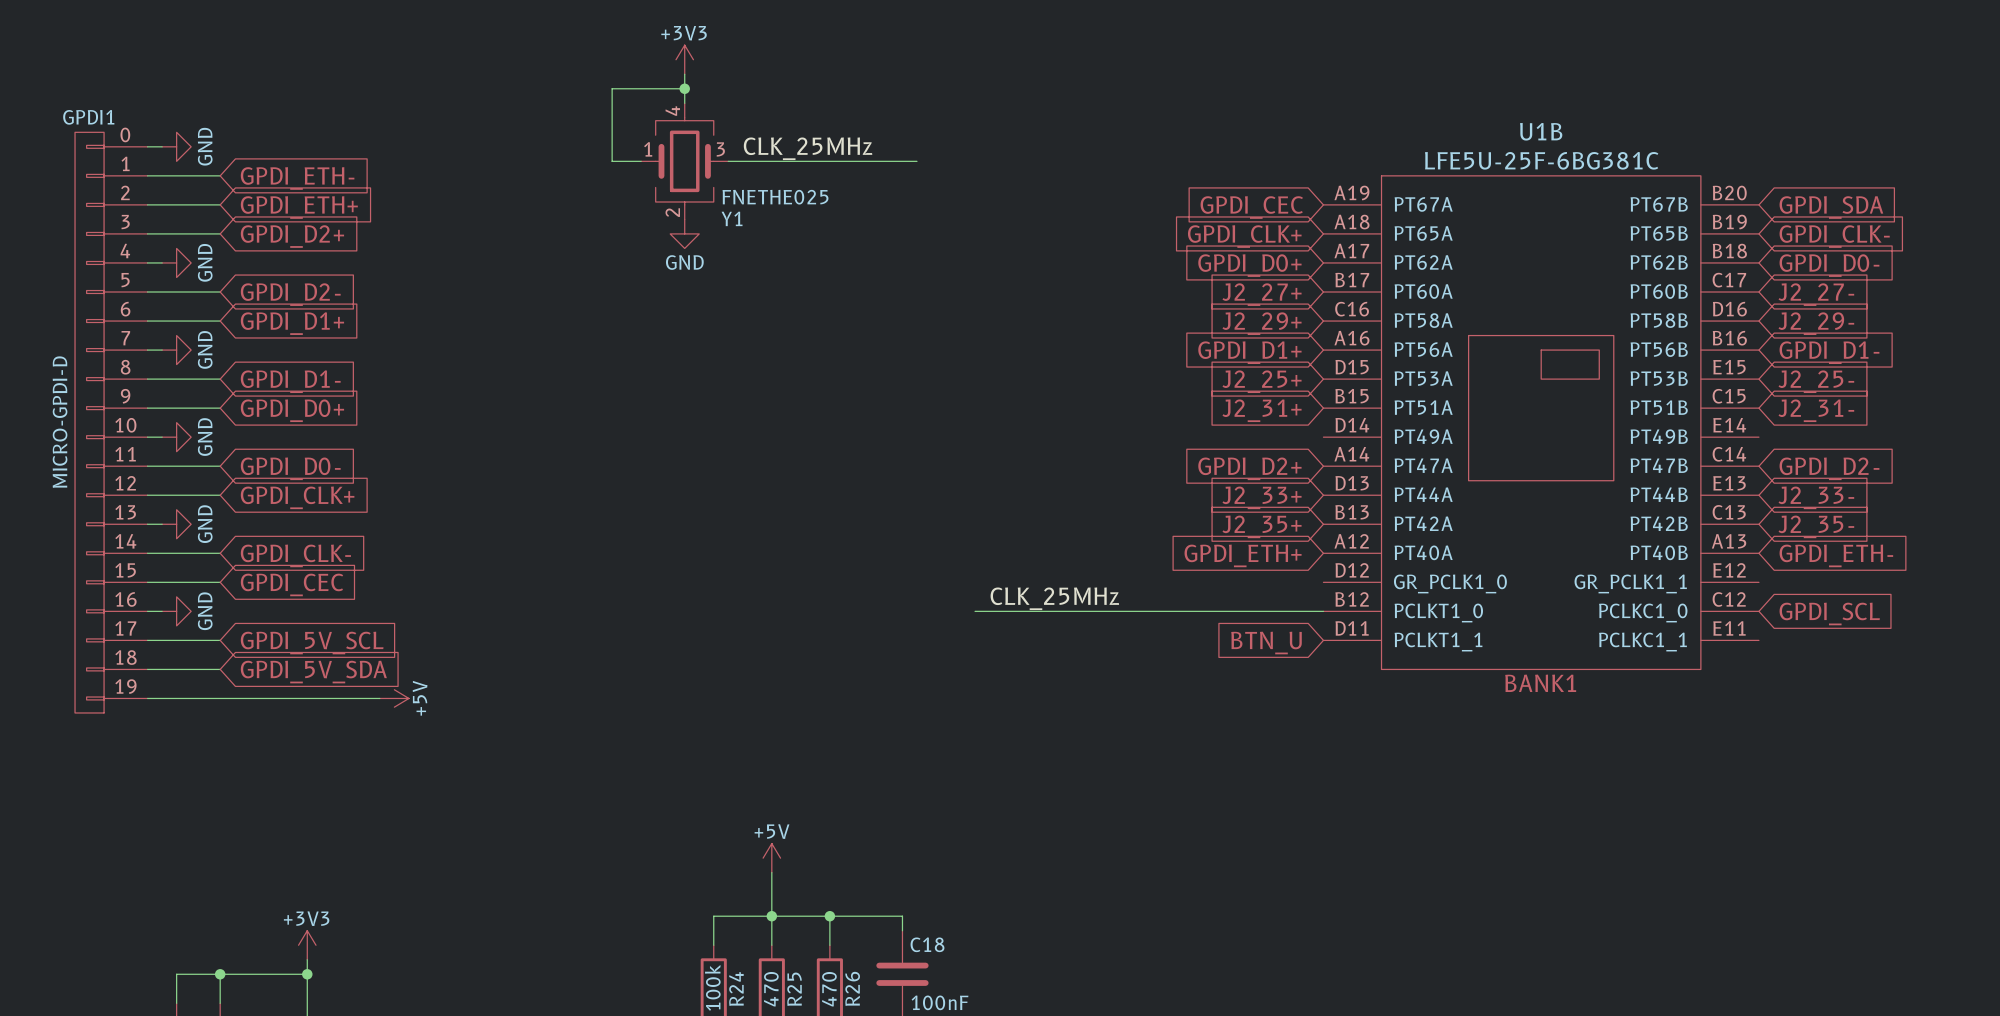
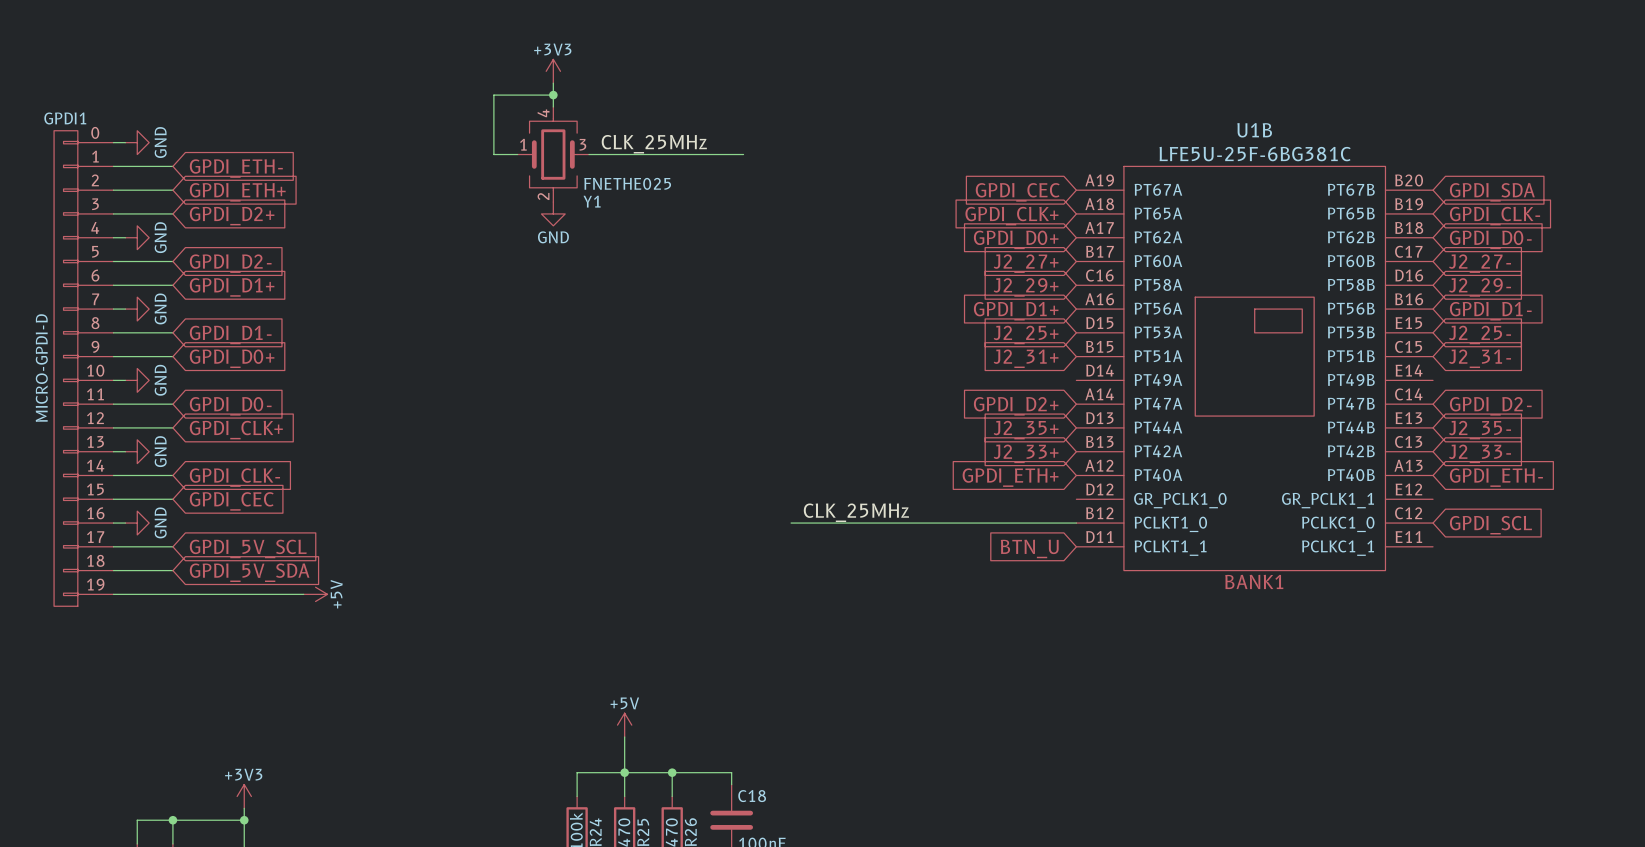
global label: J2_33+ (1262, 497) -> J2_35+ (1026, 430)
global label: J2_33- (1816, 497) -> J2_35- (1480, 430)
global label: J2_35+ (1262, 526) -> J2_33+ (1026, 453)
global label: J2_35- (1816, 526) -> J2_33- (1480, 453)

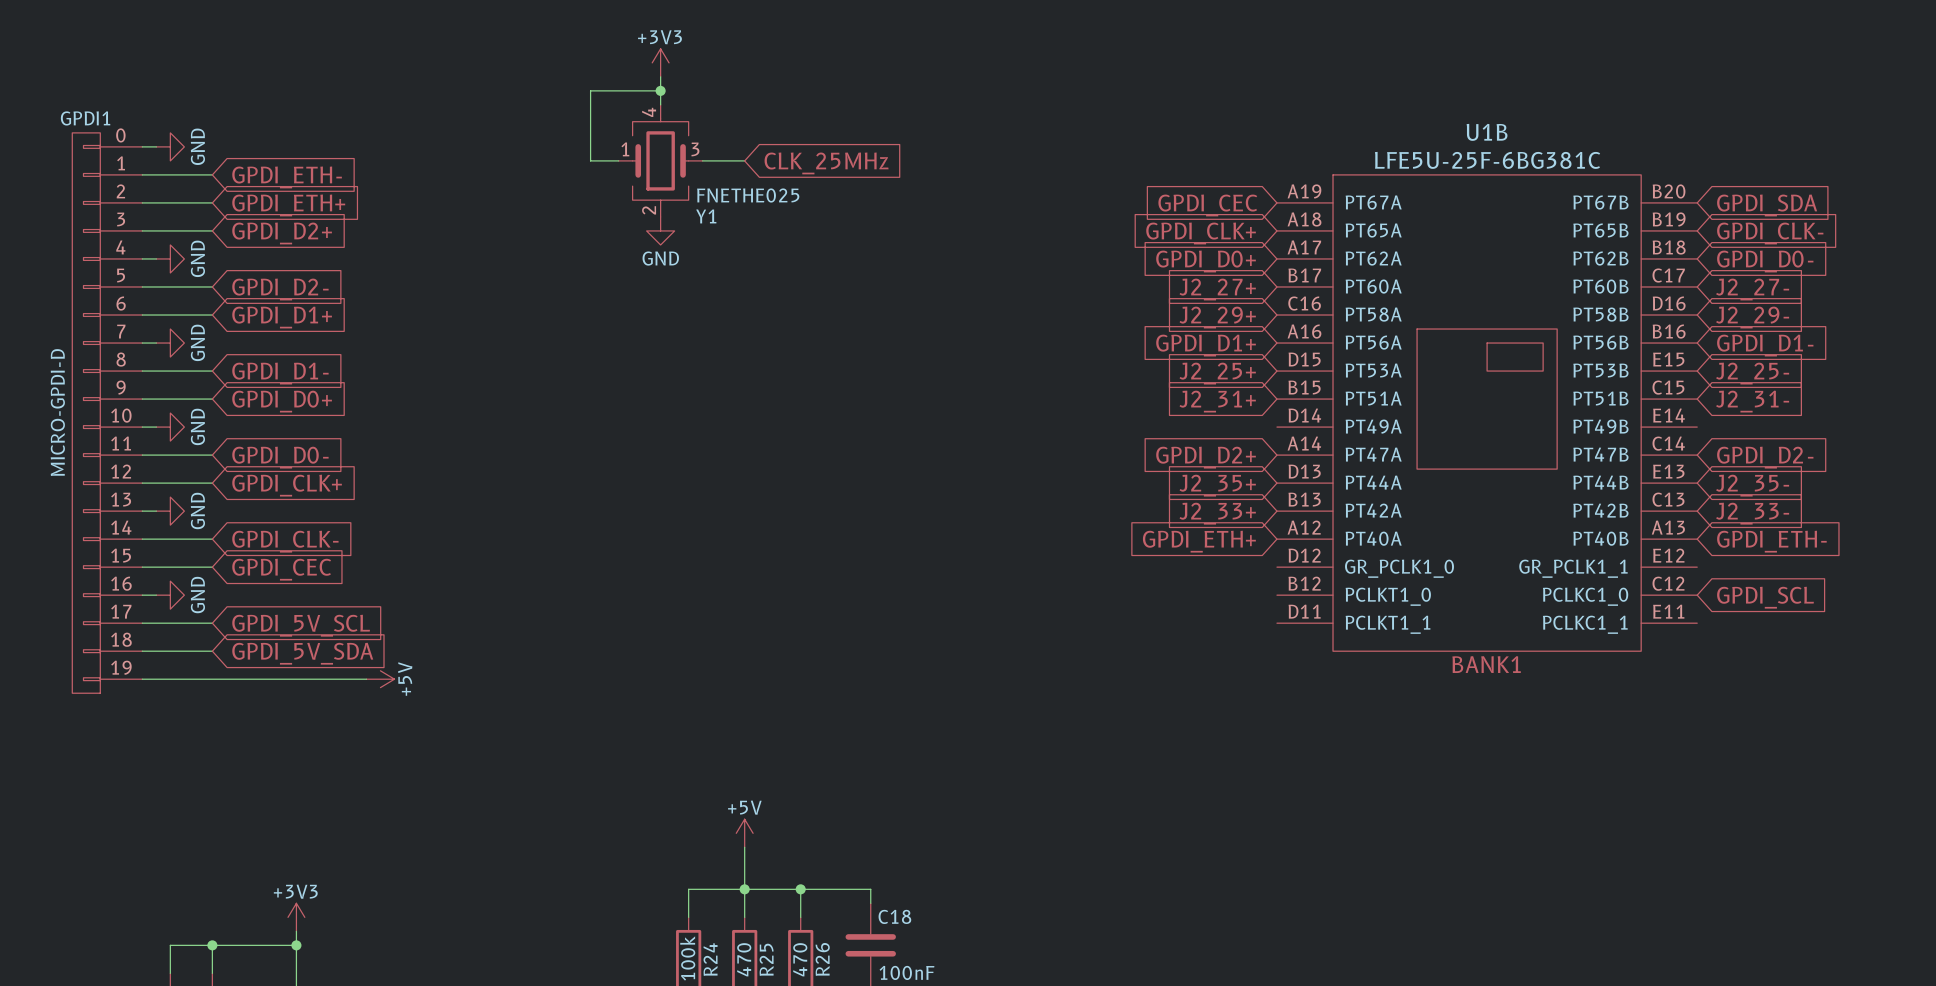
label: CLK_25MHz (654, 144) -> none
wire: (624, 154) (743, 154) -> none
global label: none -> CLK_25MHz (826, 163)
label: CLK_25MHz (856, 512) -> none
wire: (791, 523) (1076, 523) -> none
global label: BTN_U (1029, 548) -> none

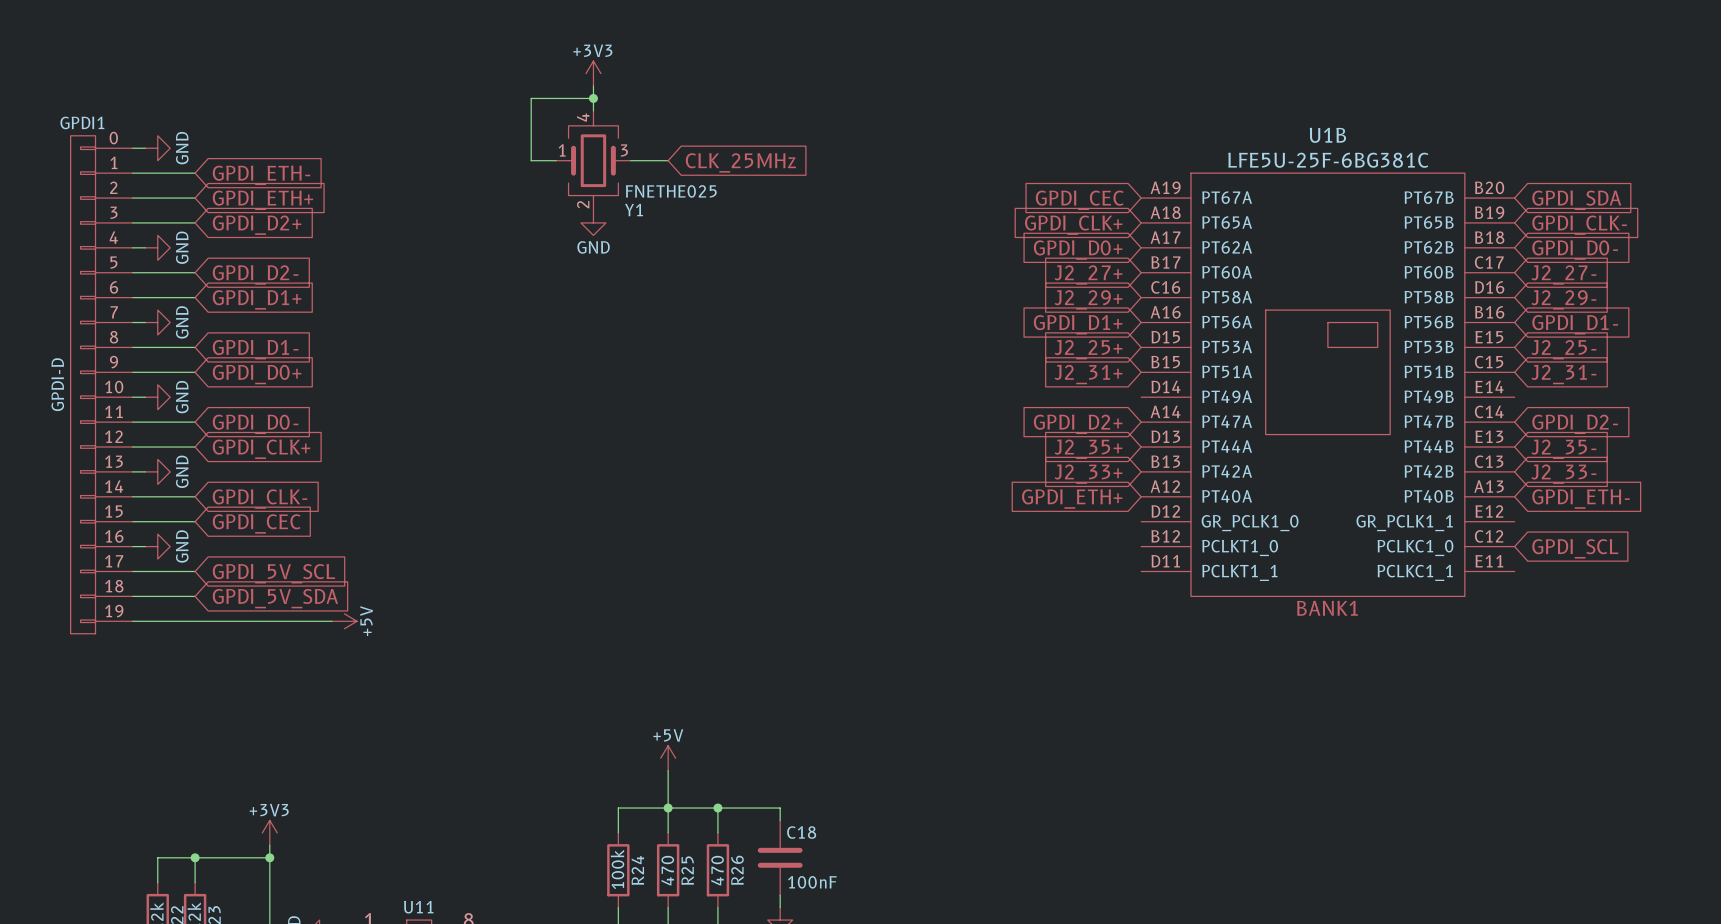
GPDI1 value: MICRO-GPDI-D (57, 412) -> GPDI-D (57, 384)

